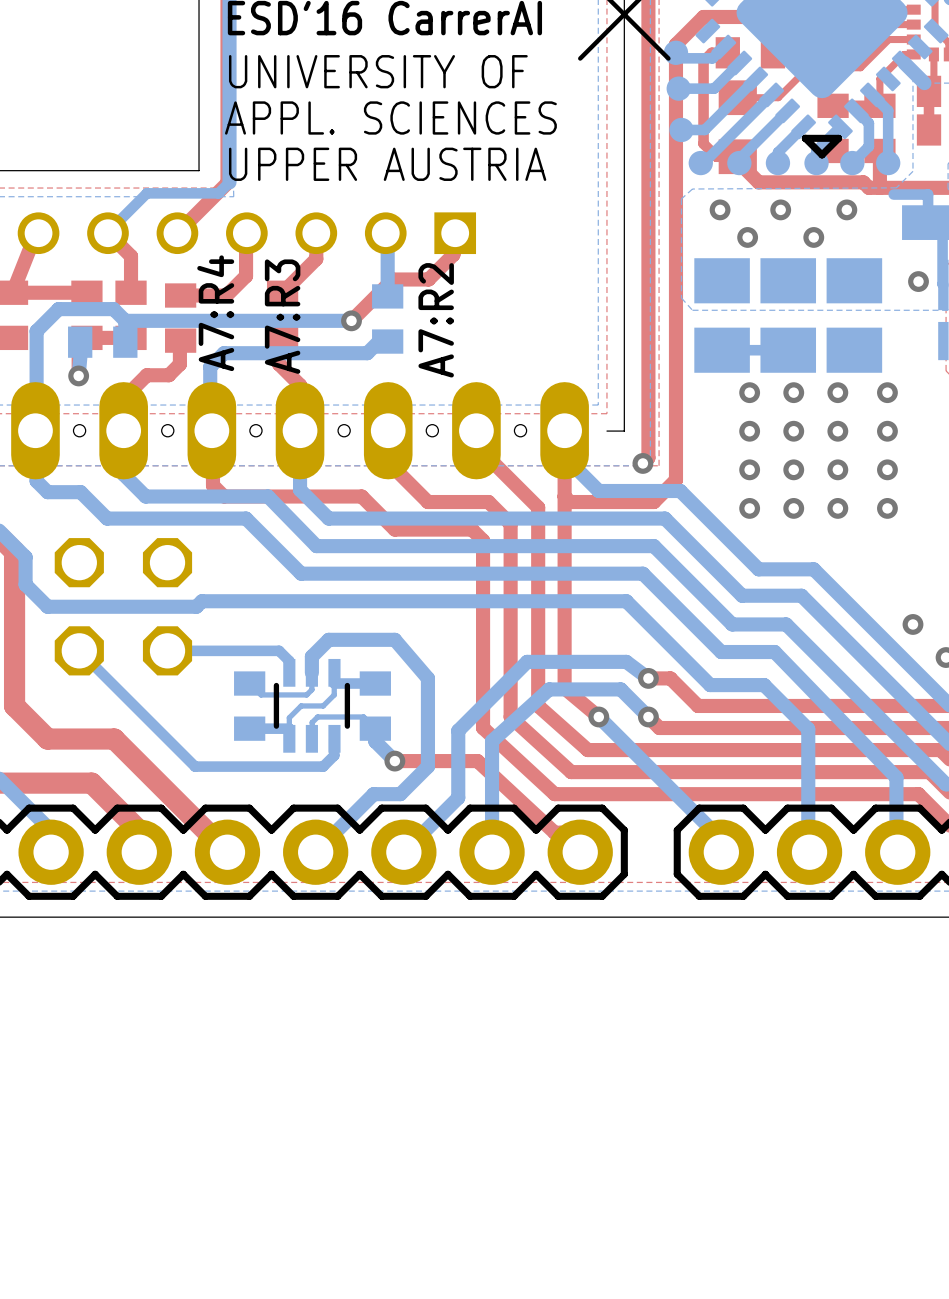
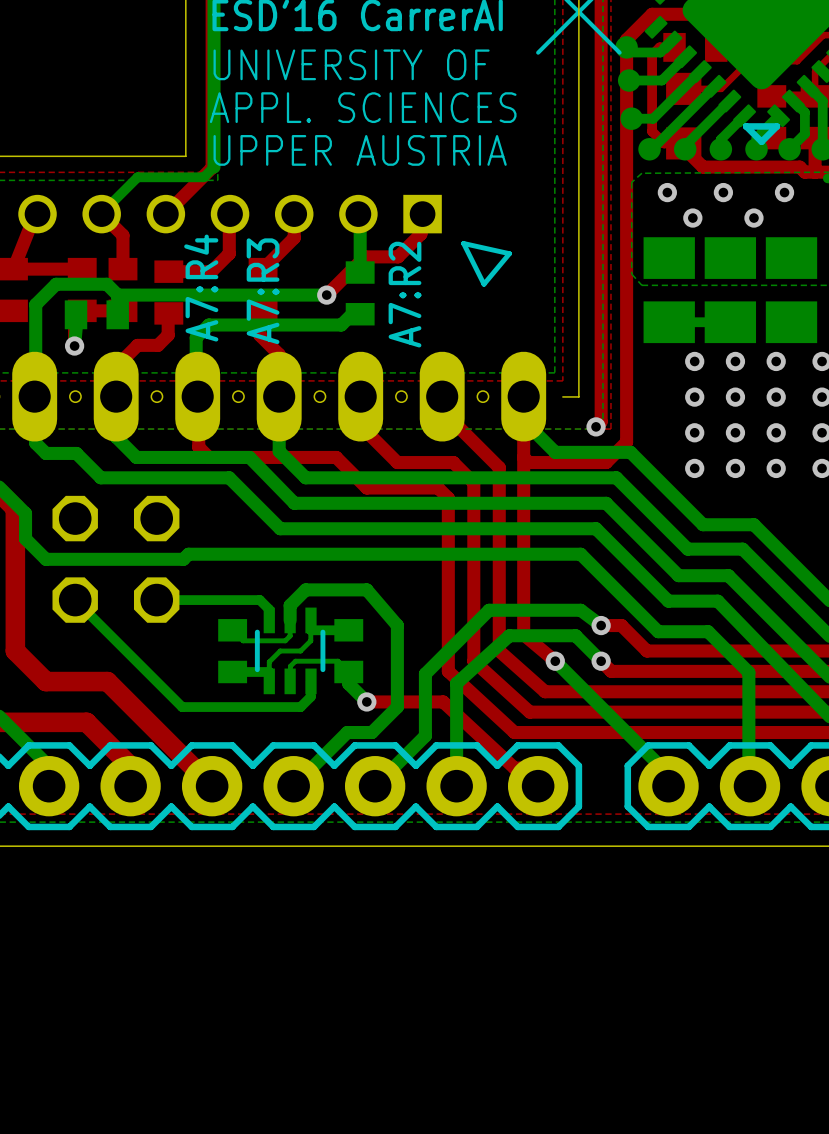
line: none -> (463, 243) (509, 253) (483, 284) (463, 243)

